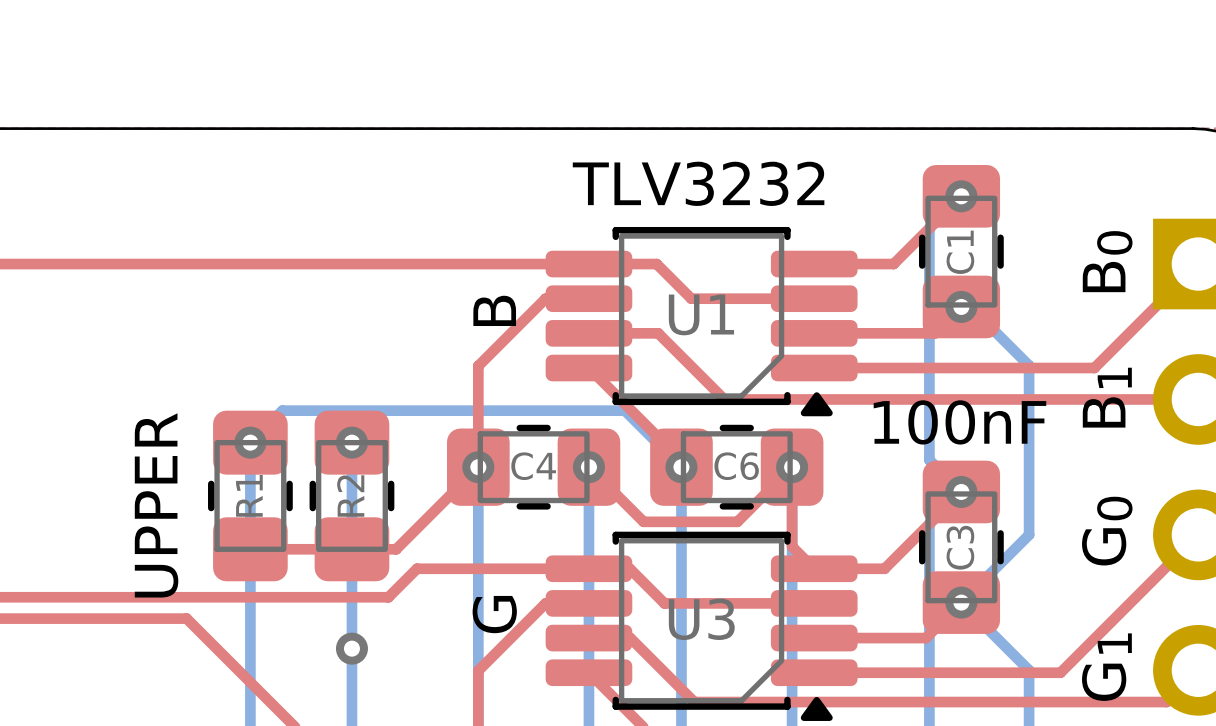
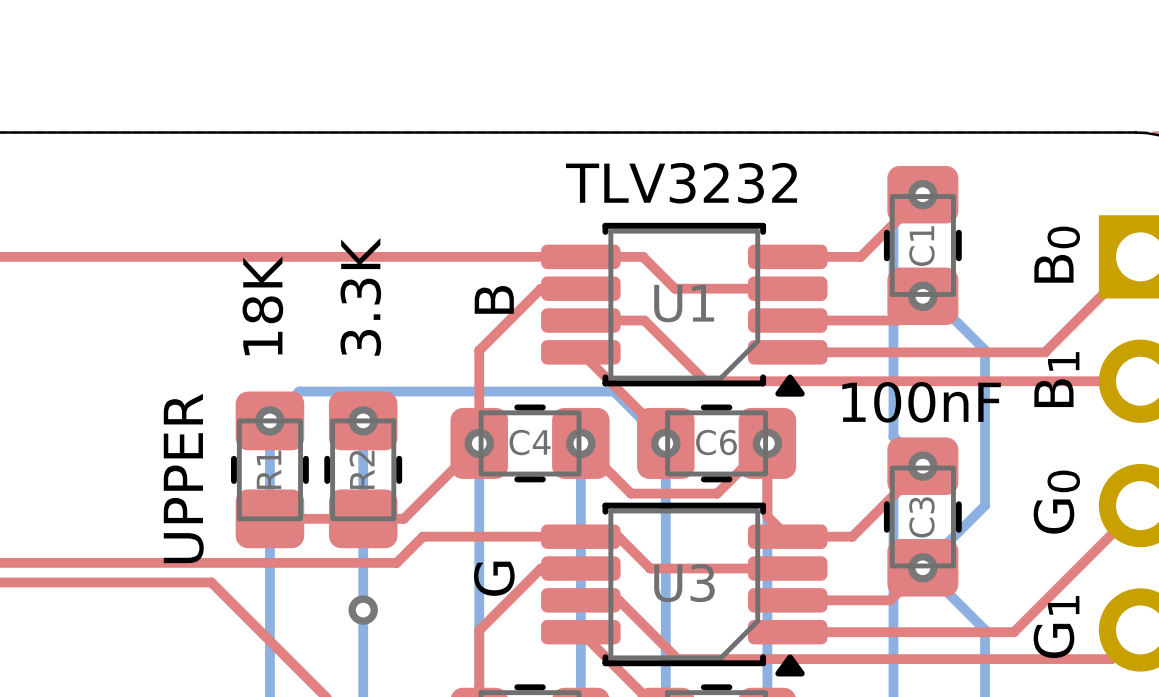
R2 value: none -> 3.3K (360, 296)
R1 value: none -> 18K (262, 305)

